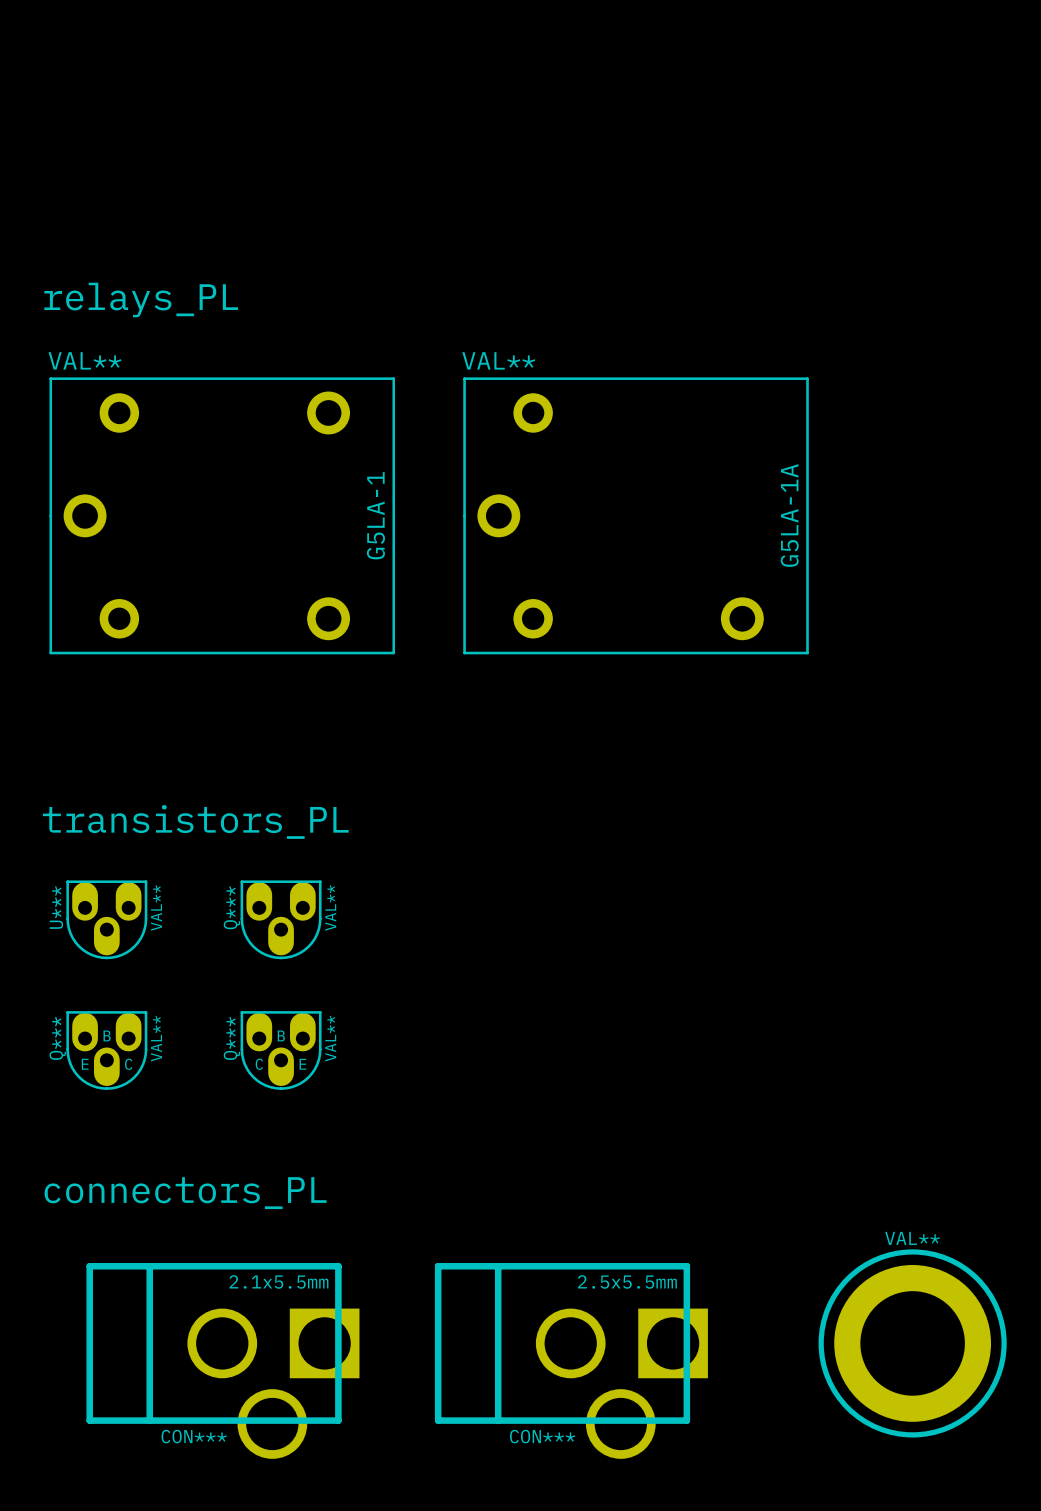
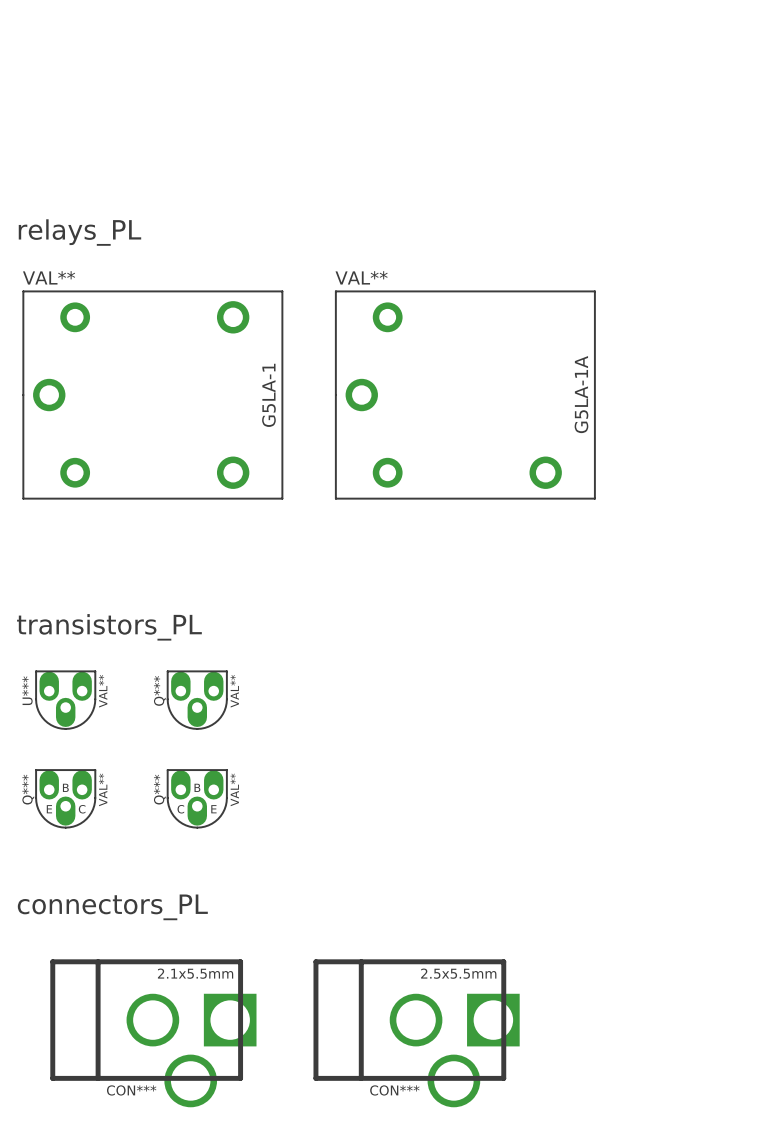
part: VAL** (912, 1343) -> none

